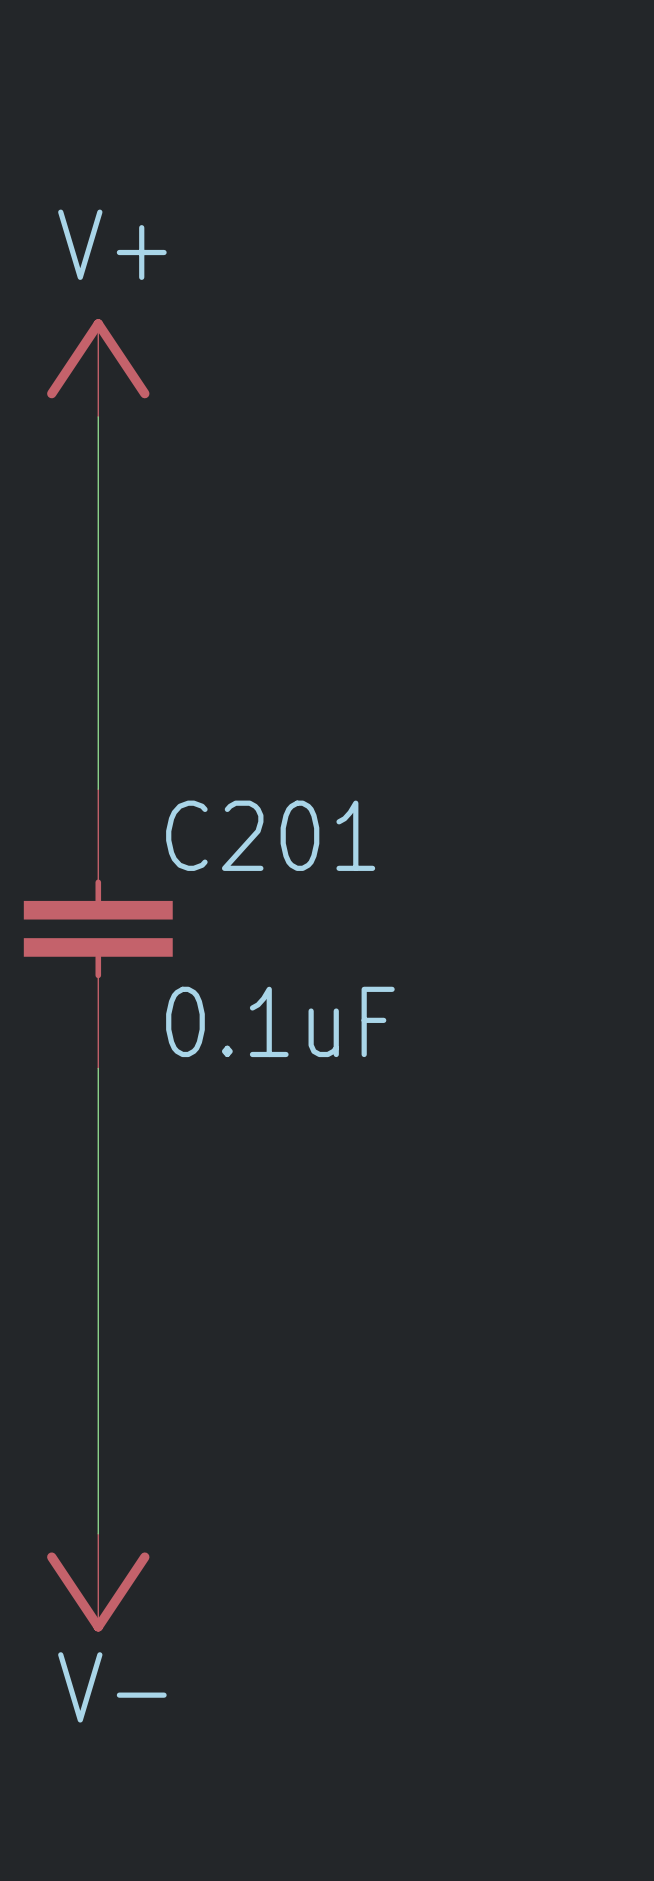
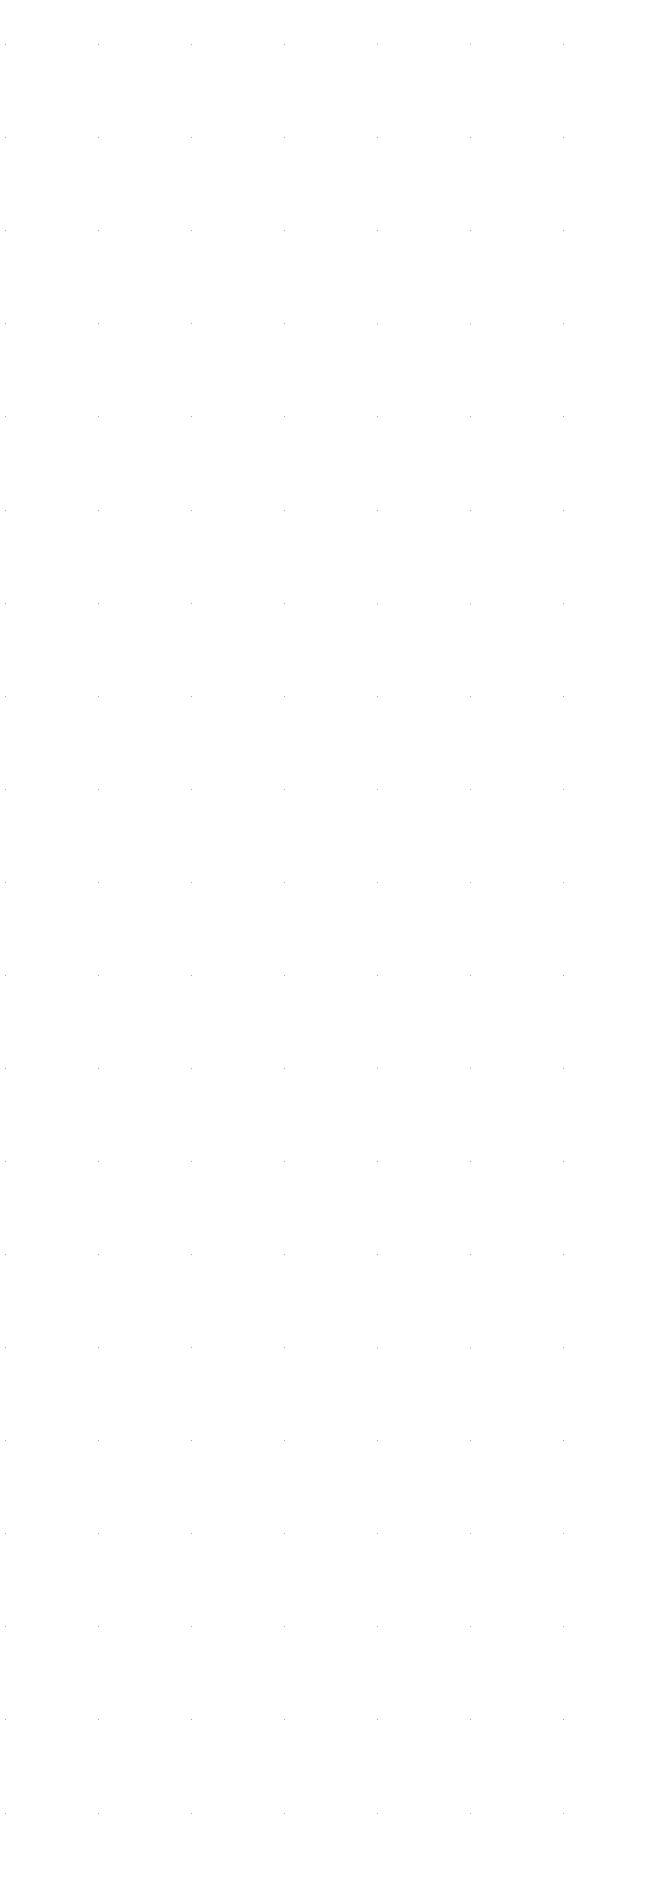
power symbol: V+ (98, 368) -> none
wire: (98, 416) (98, 789) -> none
C201: 0.1uF (98, 928) -> none
wire: (98, 1068) (98, 1533) -> none
power symbol: V- (98, 1582) -> none

